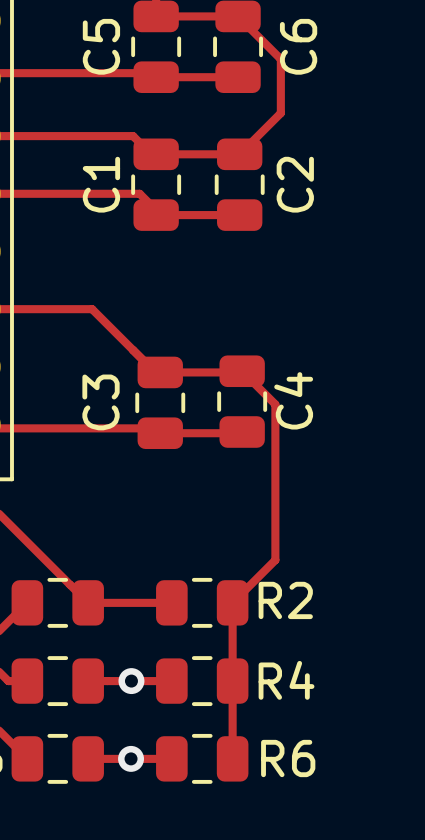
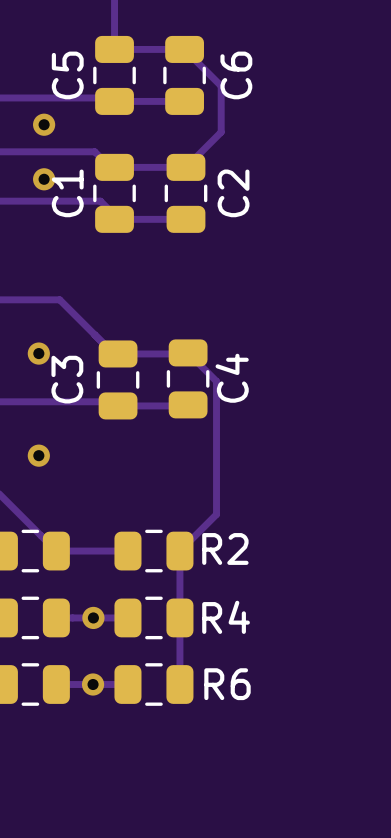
via: none -> (44, 124)
via: none -> (44, 179)
via: none -> (38, 353)
via: none -> (38, 455)

